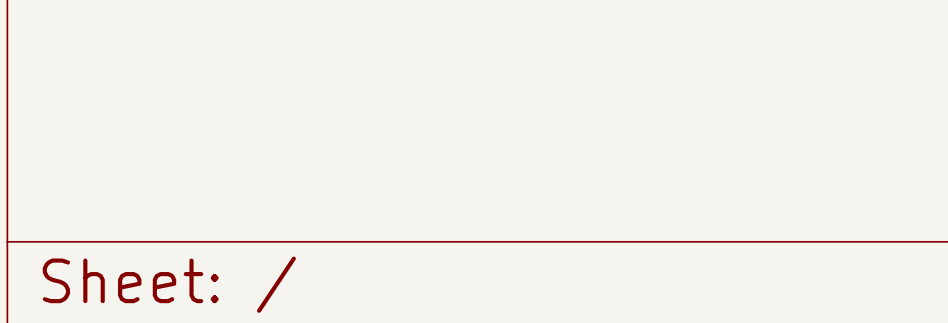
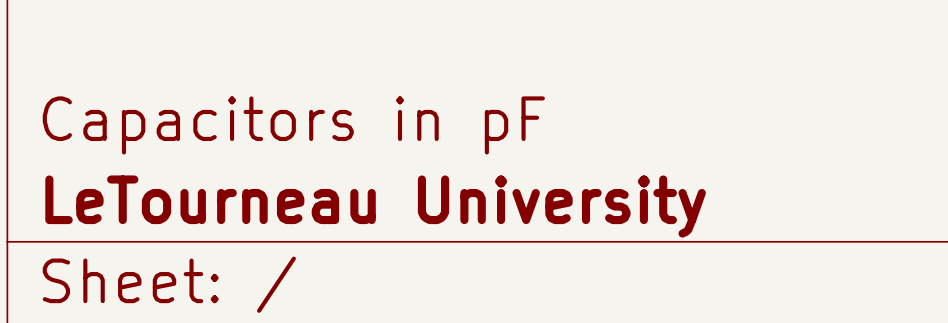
title block: none -> Capacitors in pF (293, 125)
title block: none -> LeTourneau University (375, 206)

